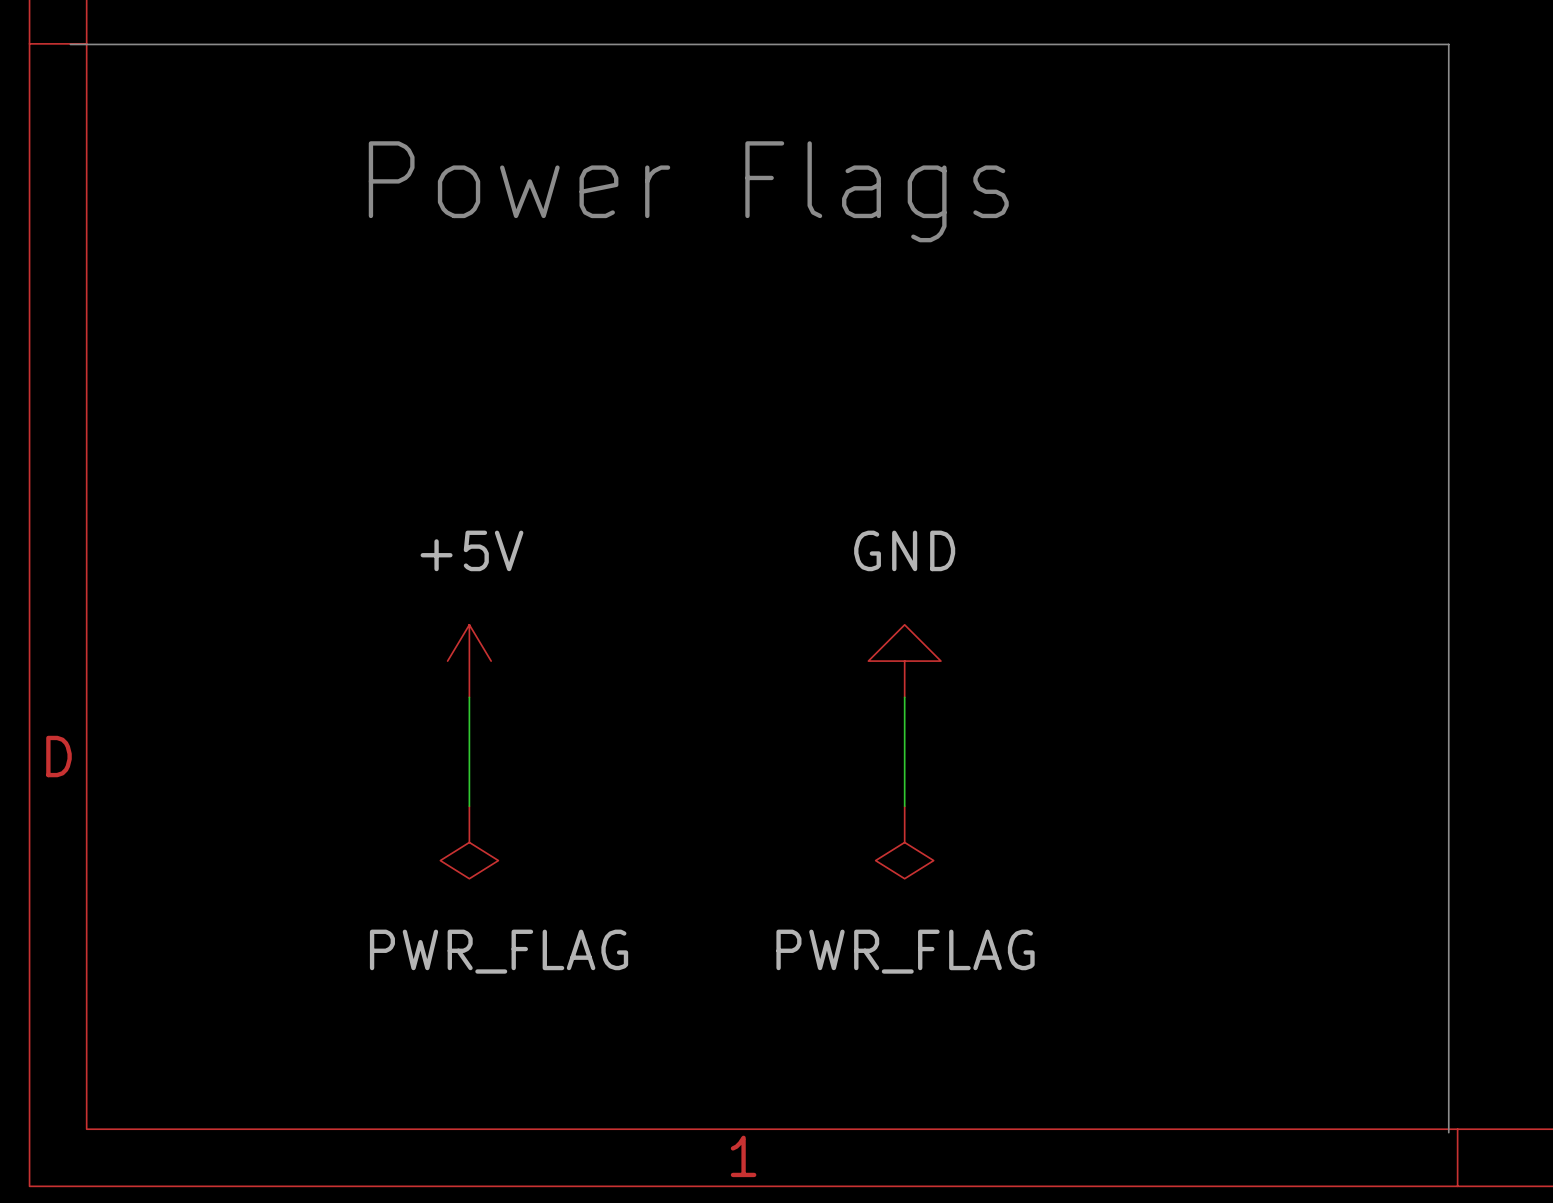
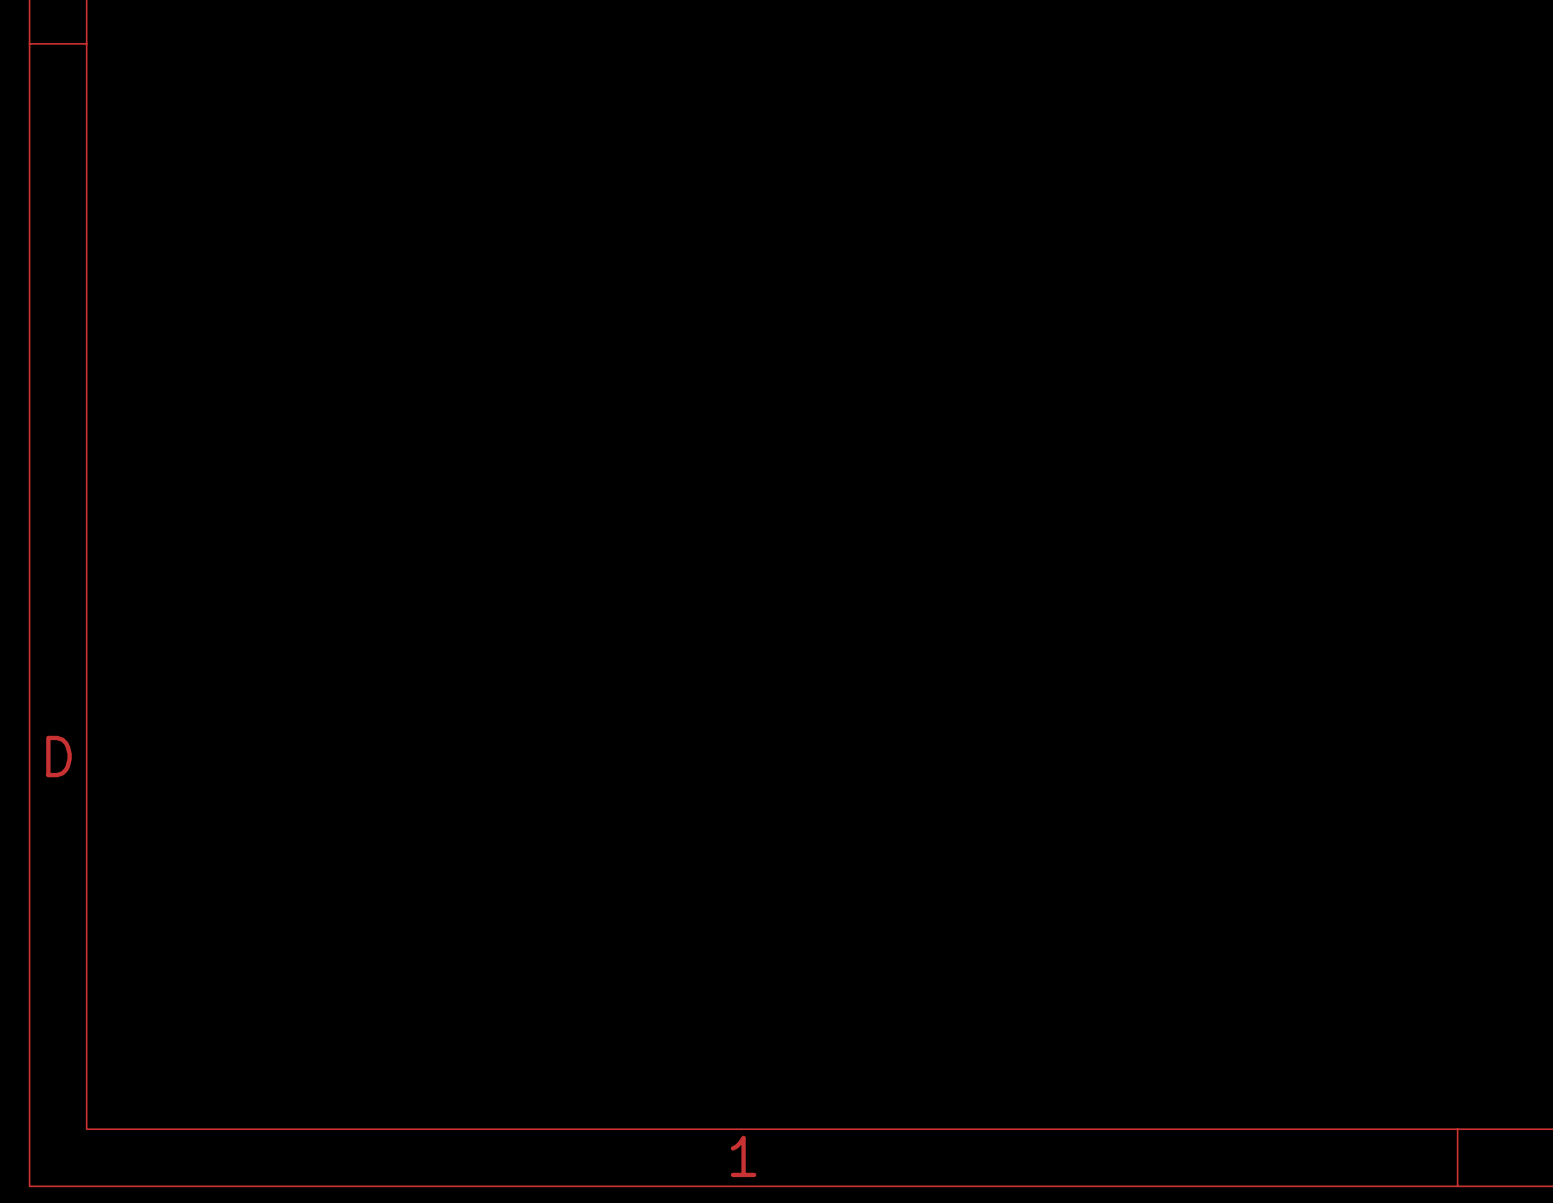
line: (70, 44) (1448, 44) (1448, 1132) -> none
text: Power Flags (688, 191) -> none
power symbol: +5V (469, 661) -> none
power symbol: GND (904, 661) -> none
wire: (469, 697) (469, 806) -> none
wire: (904, 697) (904, 806) -> none
power symbol: PWR_FLAG (469, 842) -> none
power symbol: PWR_FLAG (904, 842) -> none

